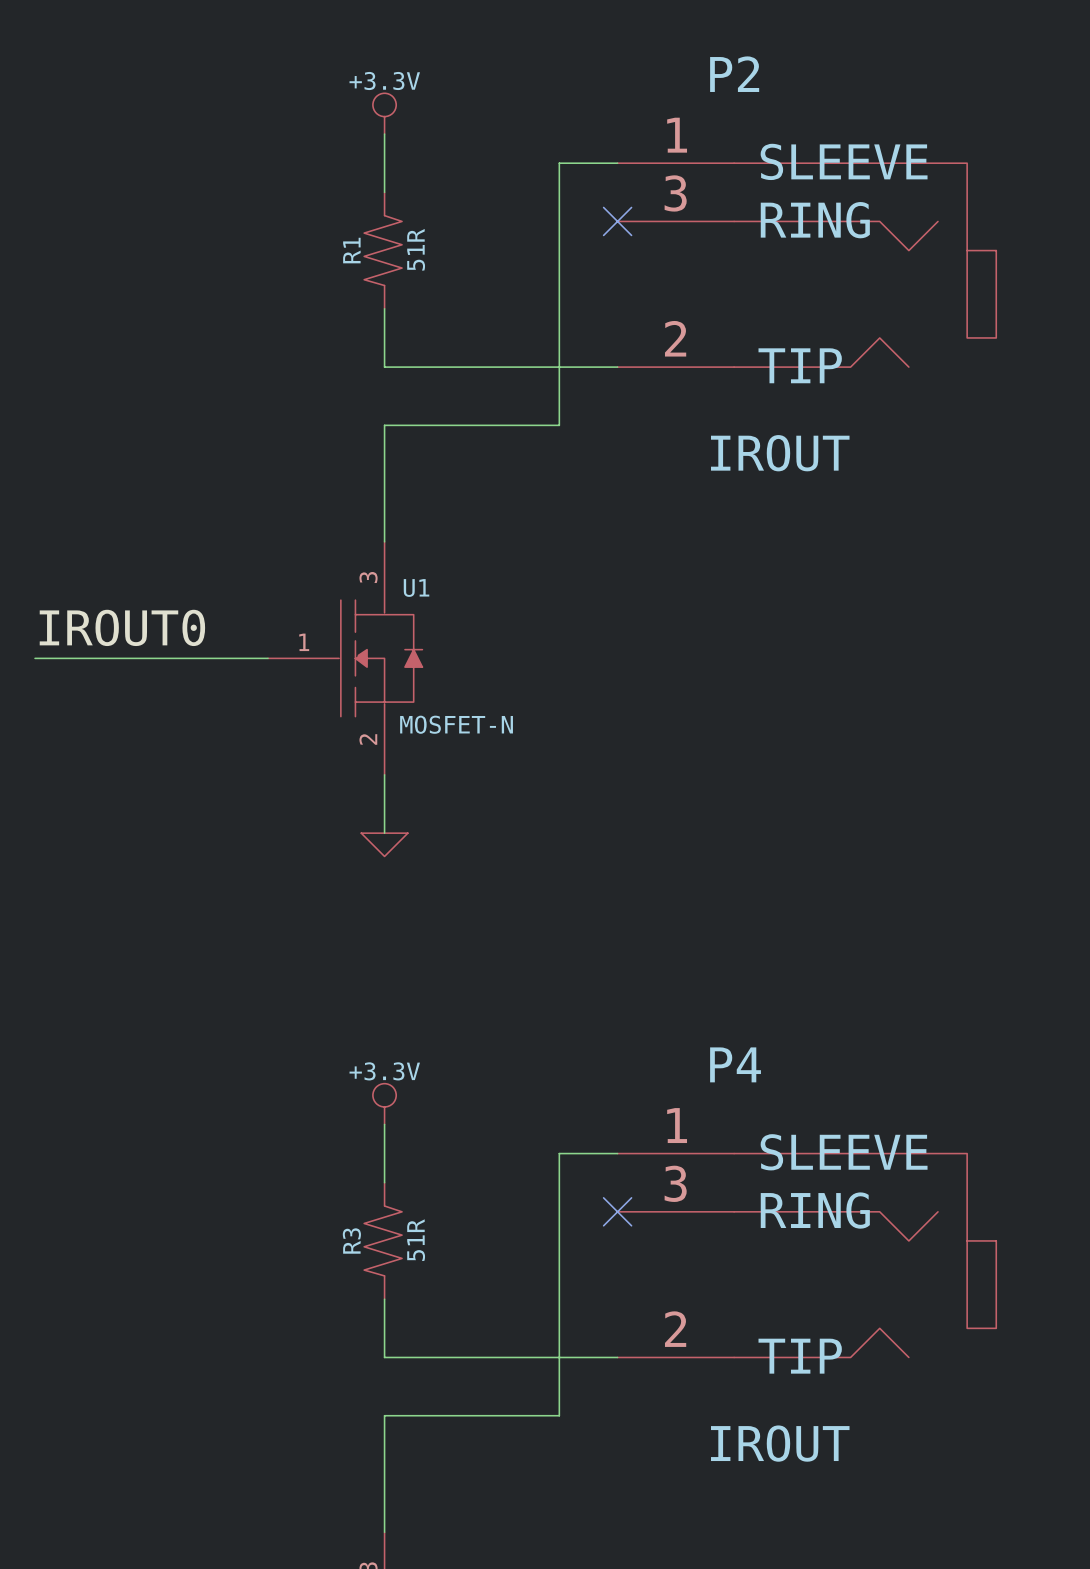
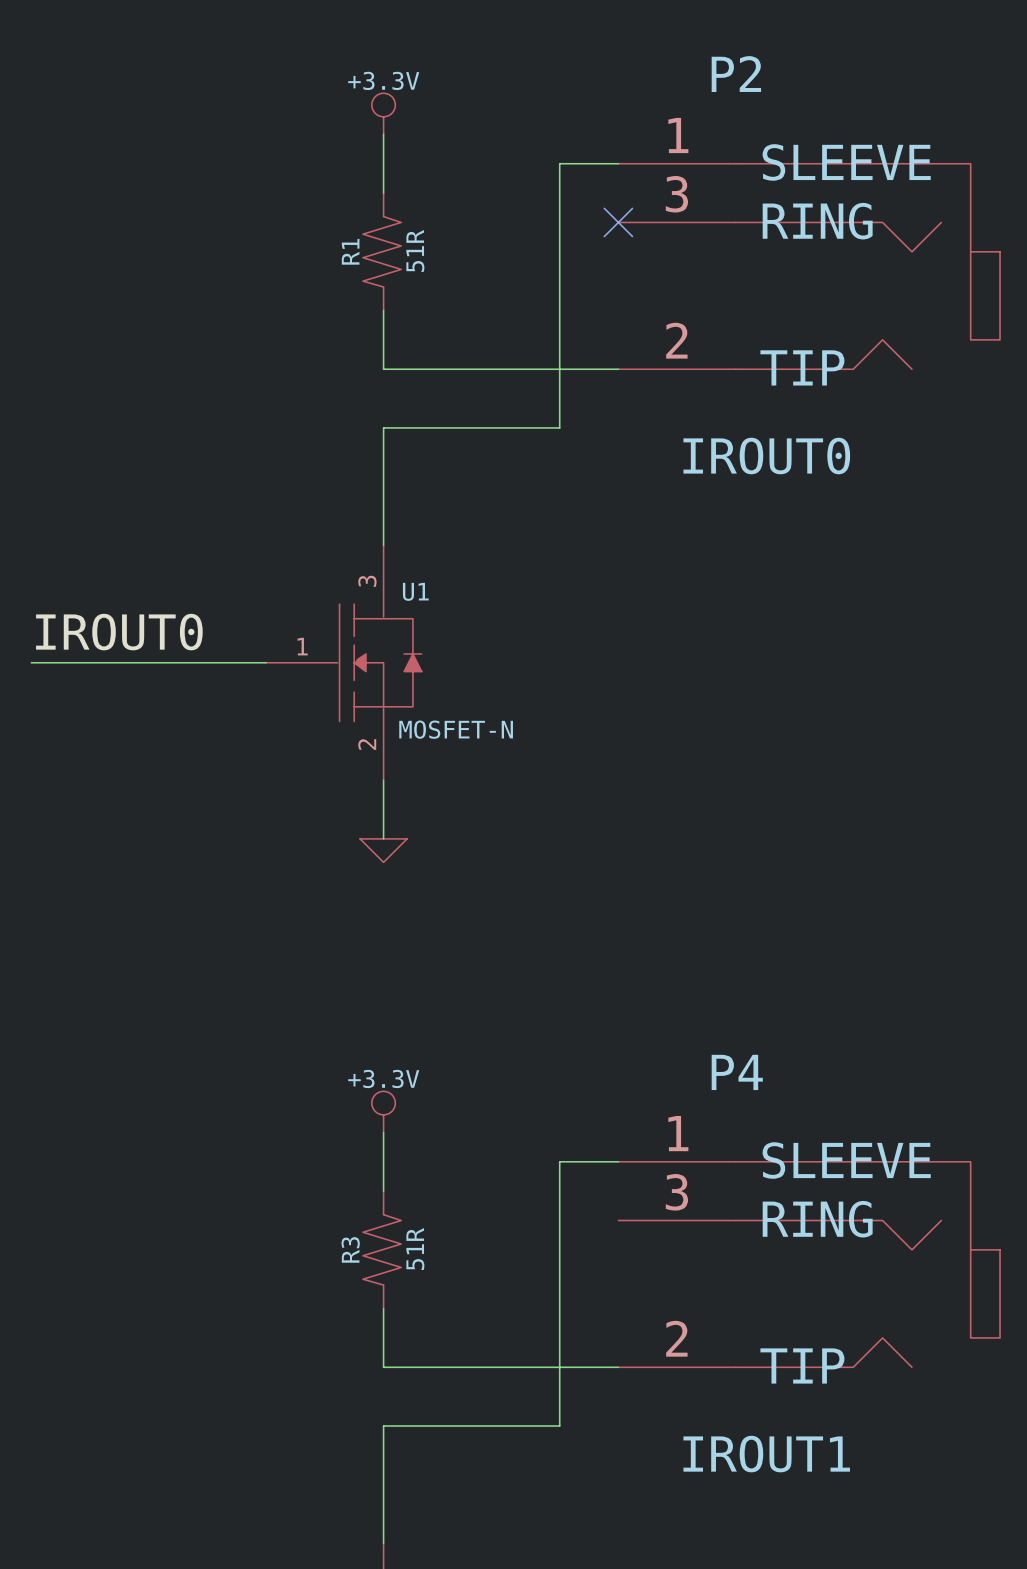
P2 value: IROUT (780, 453) -> IROUT0 (766, 456)
no-connect mark: (617, 1211) -> none
P4 value: IROUT (780, 1443) -> IROUT1 (766, 1454)

